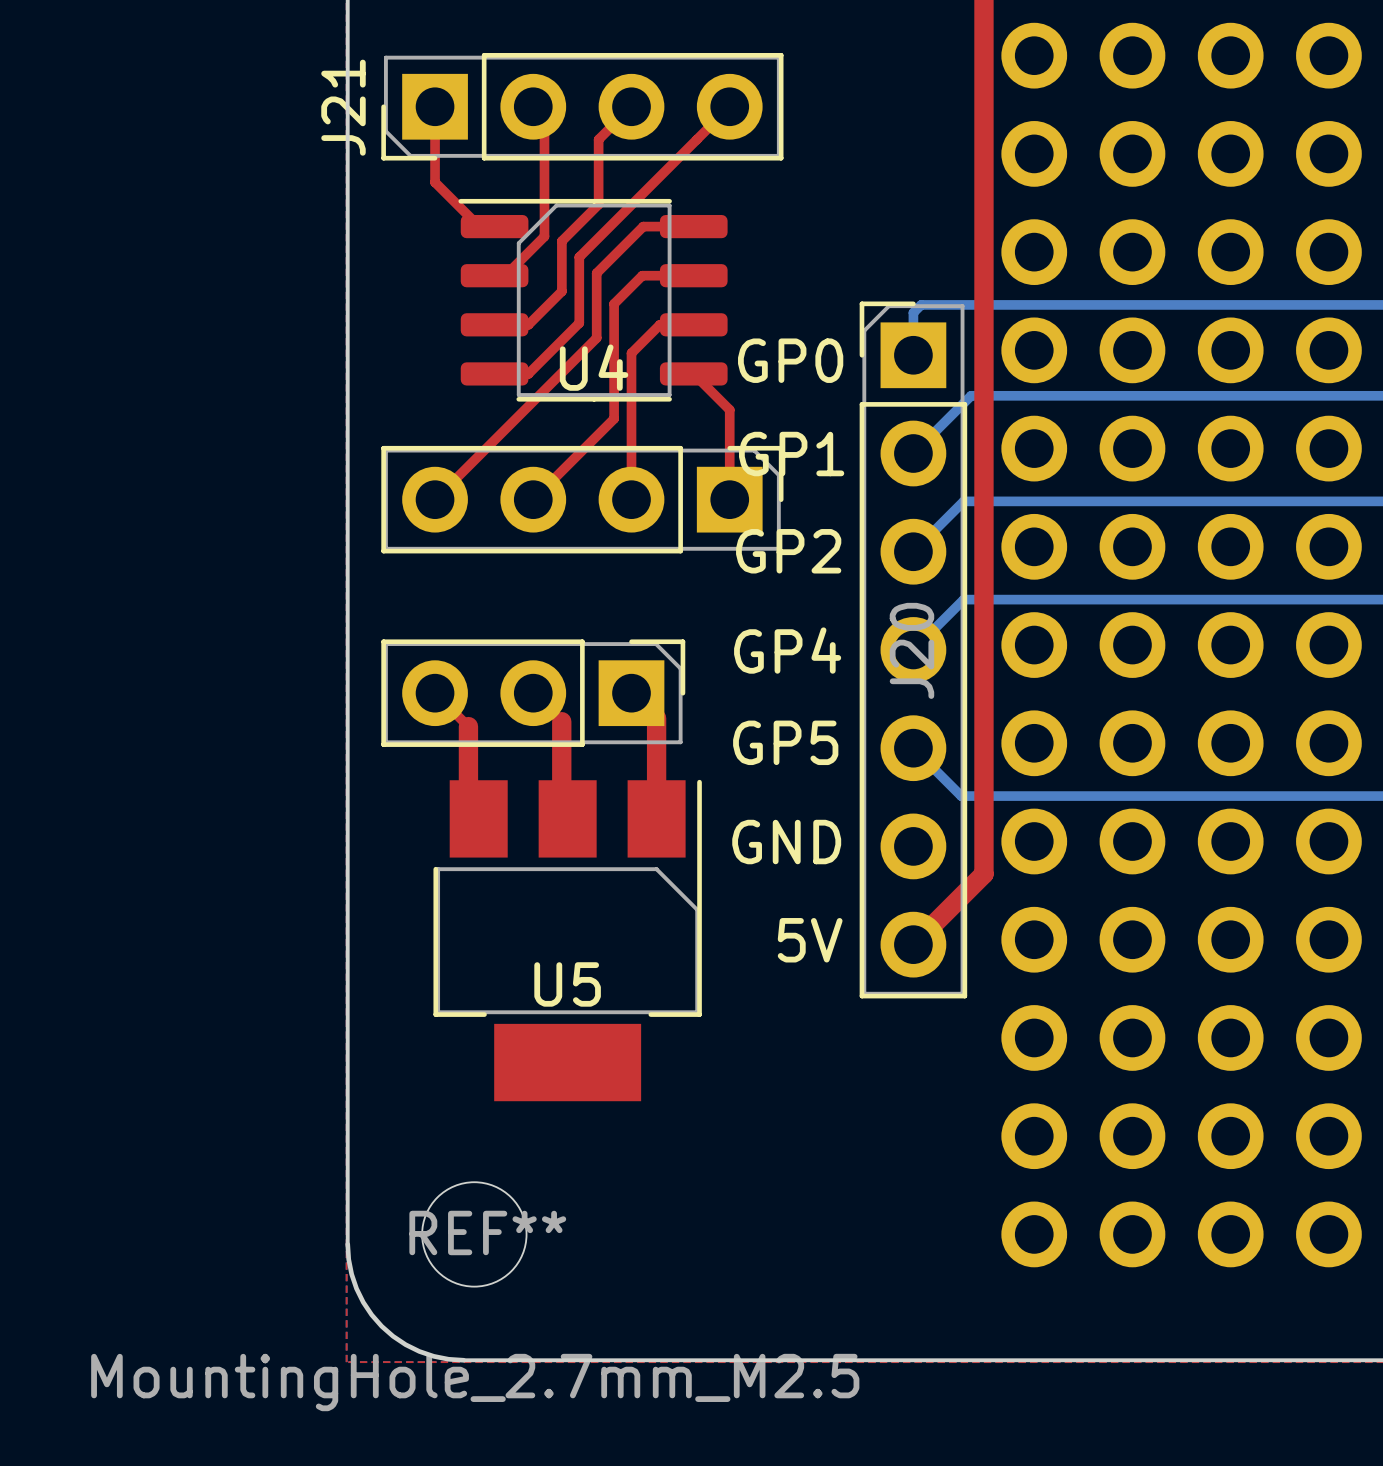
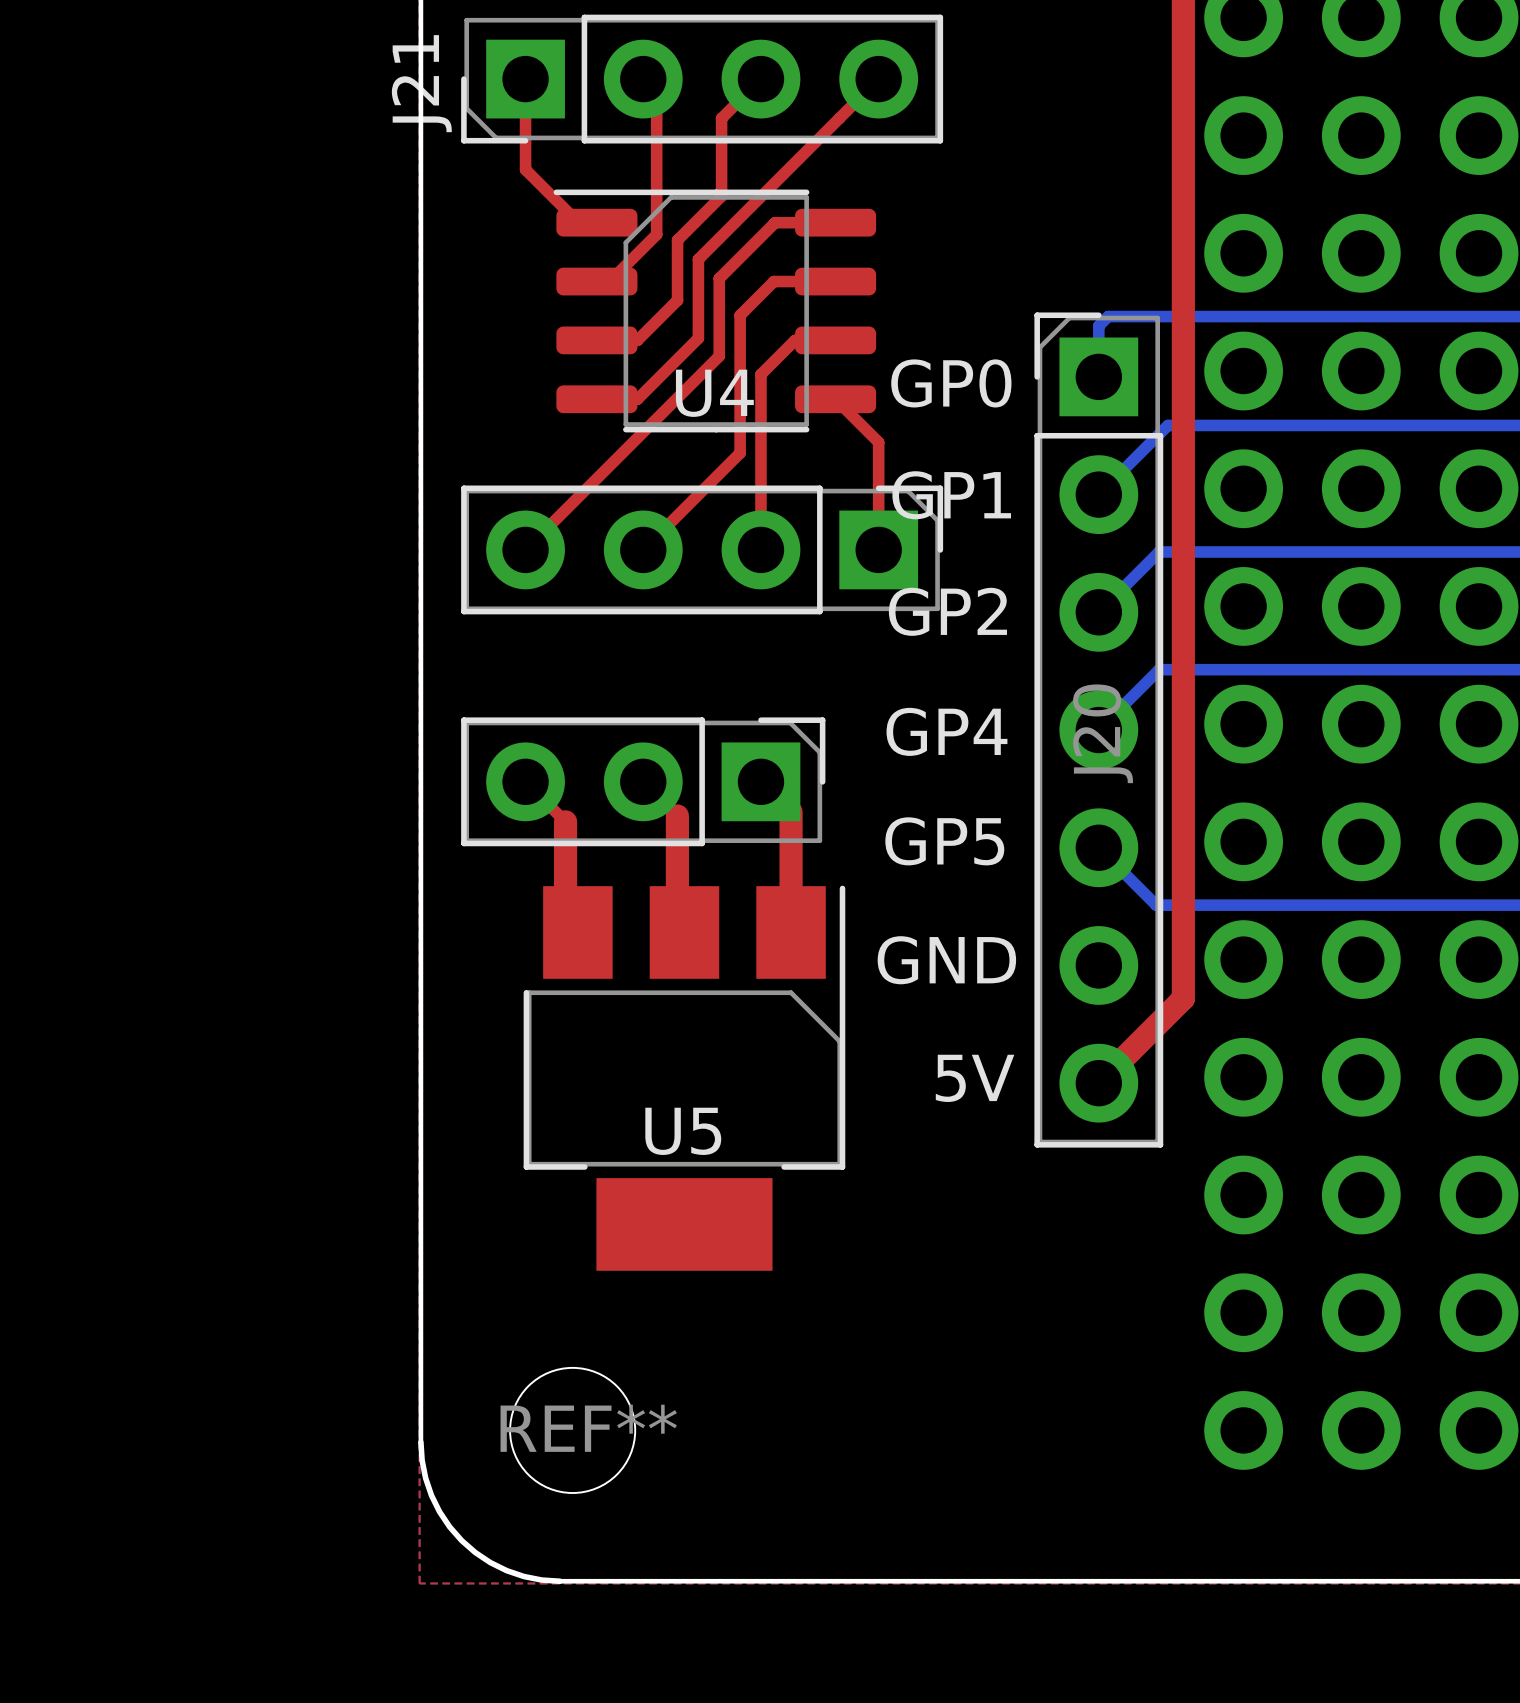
REF** value: MountingHole_2.7mm_M2.5 (475, 1382) -> none

